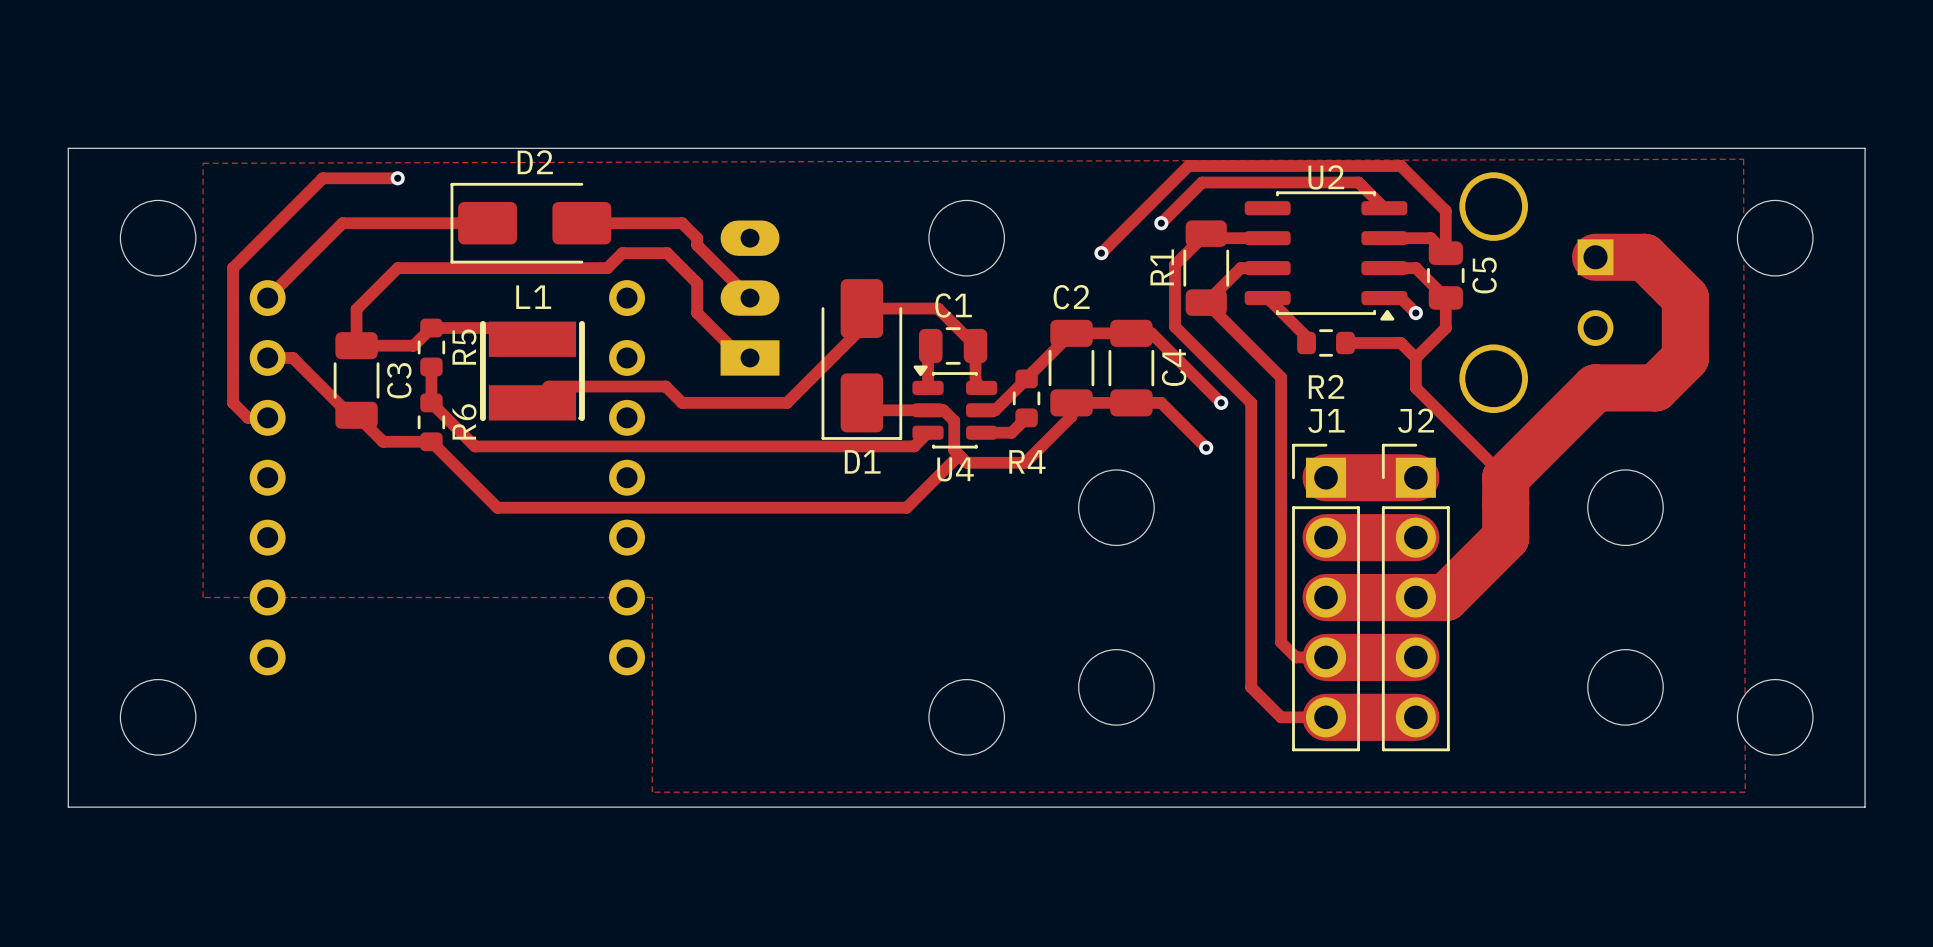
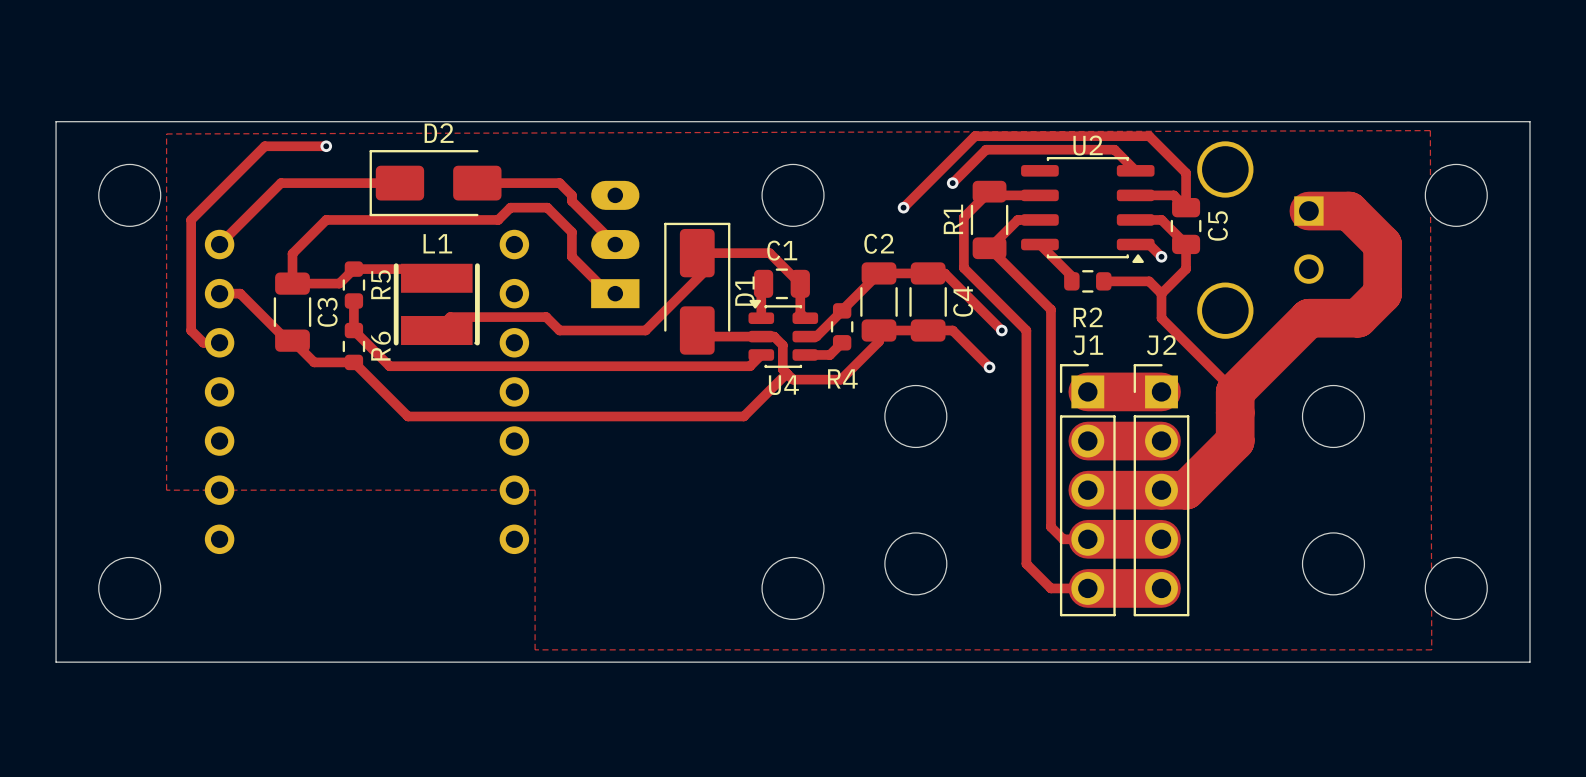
D1 rotation: 0° (861, 359) -> 180° (697, 288)
D1 name position: D1 (862, 461) -> D1 (744, 291)

